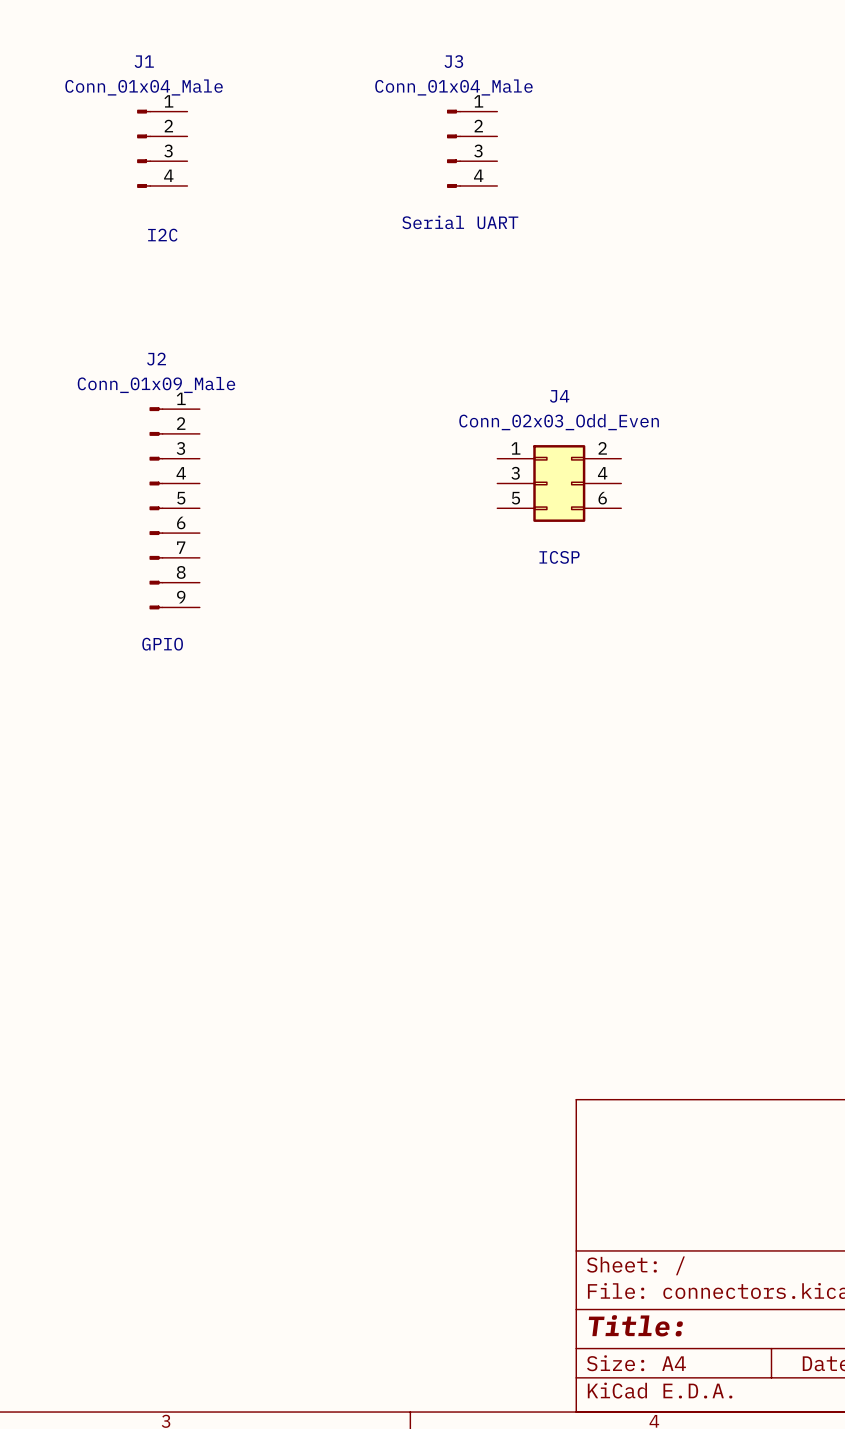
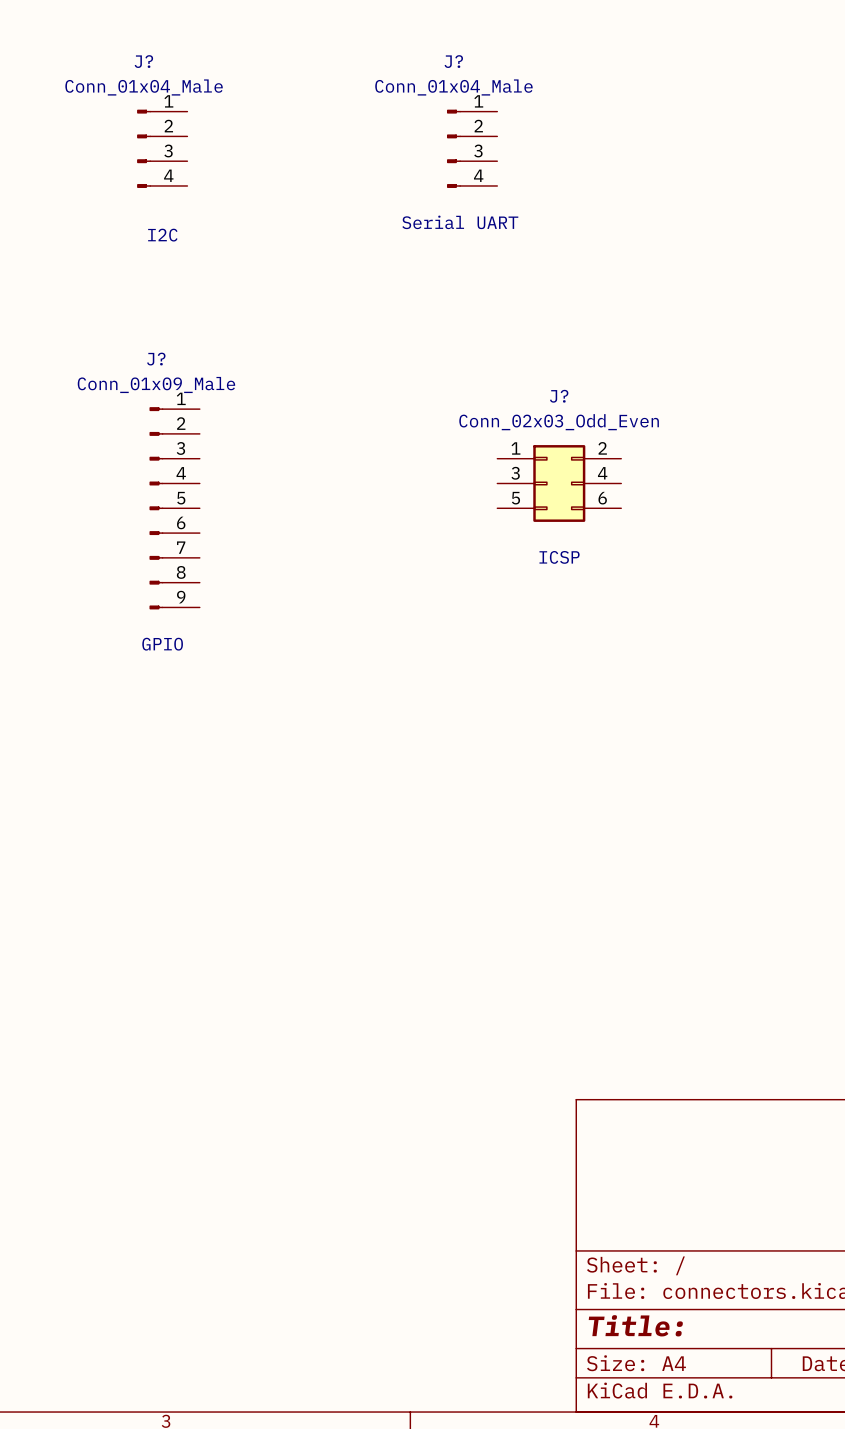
J1 name: J1 (144, 61) -> J? (143, 61)
J3 name: J3 (453, 61) -> J? (453, 61)
J2 name: J2 (156, 359) -> J? (156, 359)
J4 name: J4 (559, 396) -> J? (559, 396)

